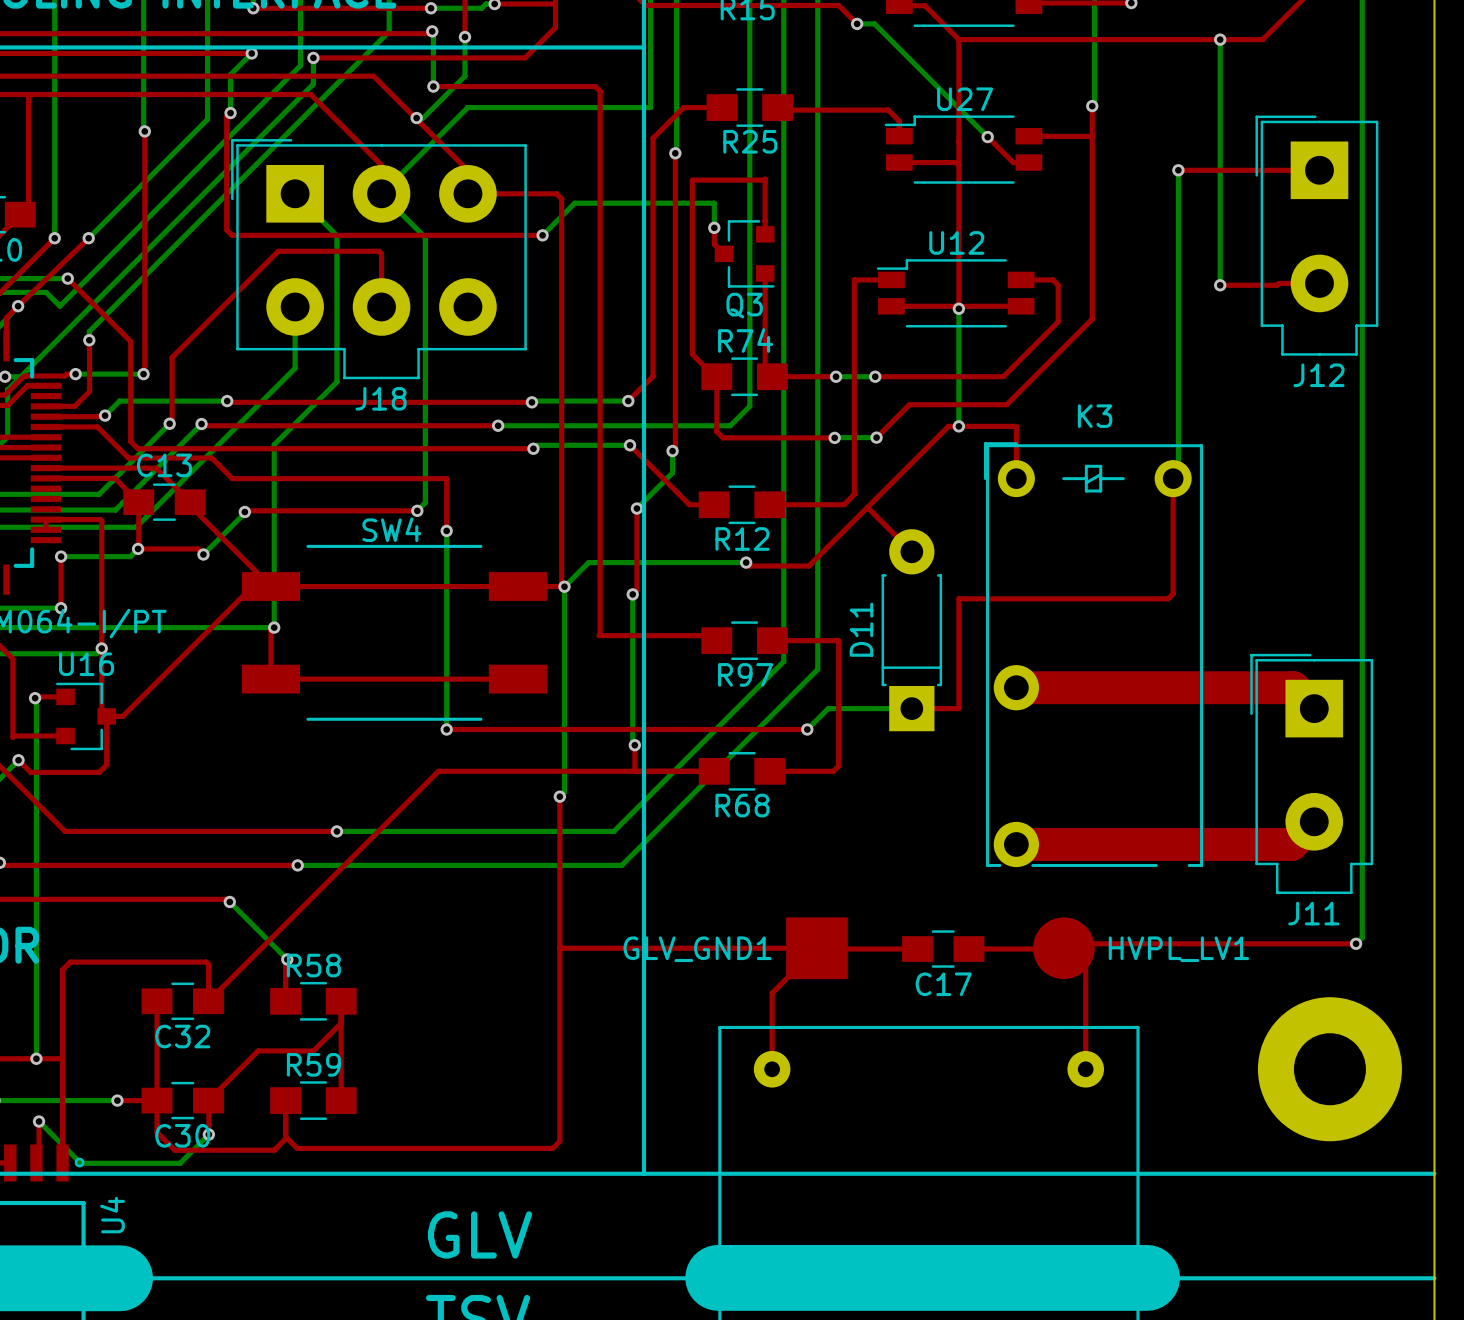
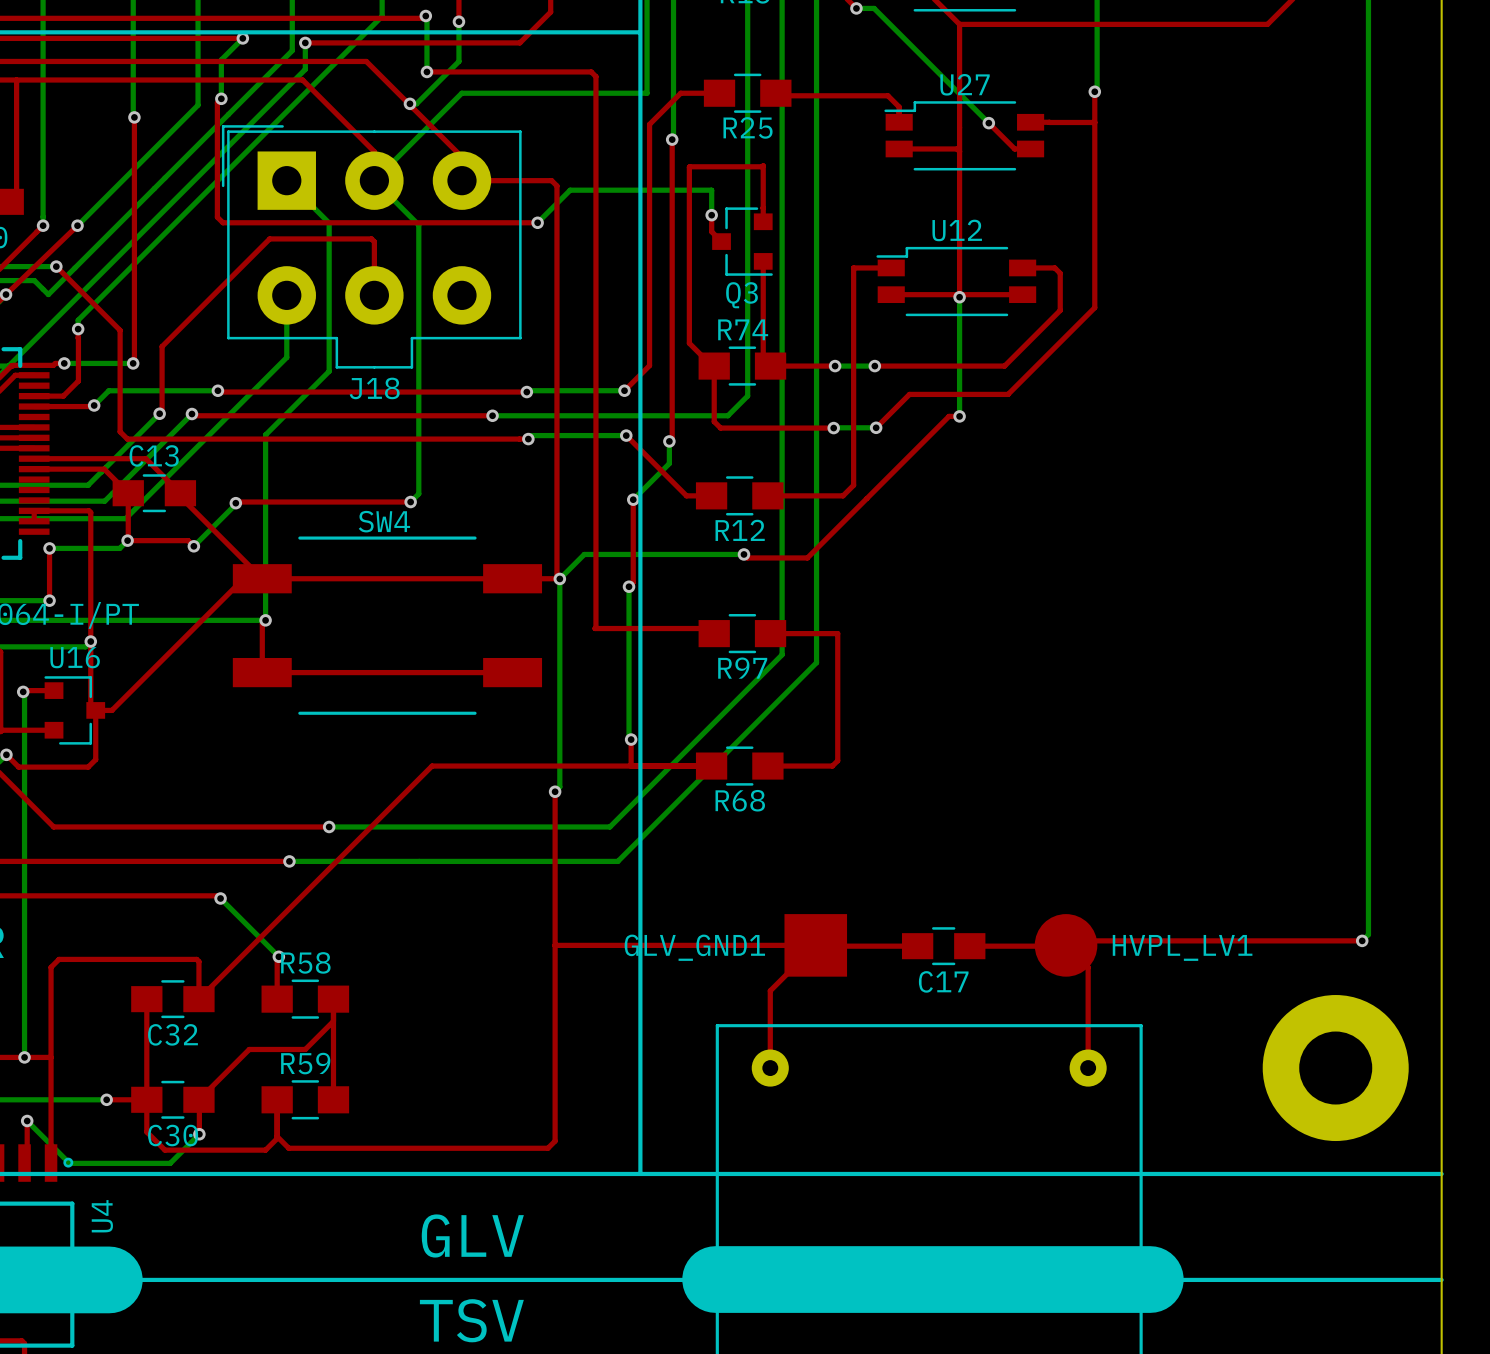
bottom track: (1220, 39) (1220, 285) -> none
via: (1220, 39) -> none
top track: (1178, 170) (1319, 170) -> none
bottom track: (1178, 170) (1178, 473) (1173, 478) -> none
via: (1178, 170) -> none
J12: (1316, 235) -> none
top track: (1319, 283) (1220, 285) -> none
via: (1220, 285) -> none
top track: (45, 426) (97, 426) (128, 458) (211, 458) (232, 478) (446, 478) (446, 530) -> none
top track: (958, 426) (1016, 426) (1016, 478) -> none
top track: (1173, 478) (1173, 593) (1167, 598) (958, 598) (958, 708) (911, 708) -> none
top track: (867, 507) (911, 551) -> none
bottom track: (446, 530) (446, 729) -> none
via: (446, 530) -> none
D11: (911, 630) -> none
K3: (1093, 654) -> none
top track: (1016, 687) (1293, 687) (1314, 708) -> none
bottom track: (911, 708) (828, 708) (807, 729) -> none
top track: (446, 729) (807, 729) -> none
via: (446, 729) -> none
via: (807, 729) -> none
J11: (1311, 773) -> none
top track: (1314, 821) (1291, 844) (1016, 844) -> none

